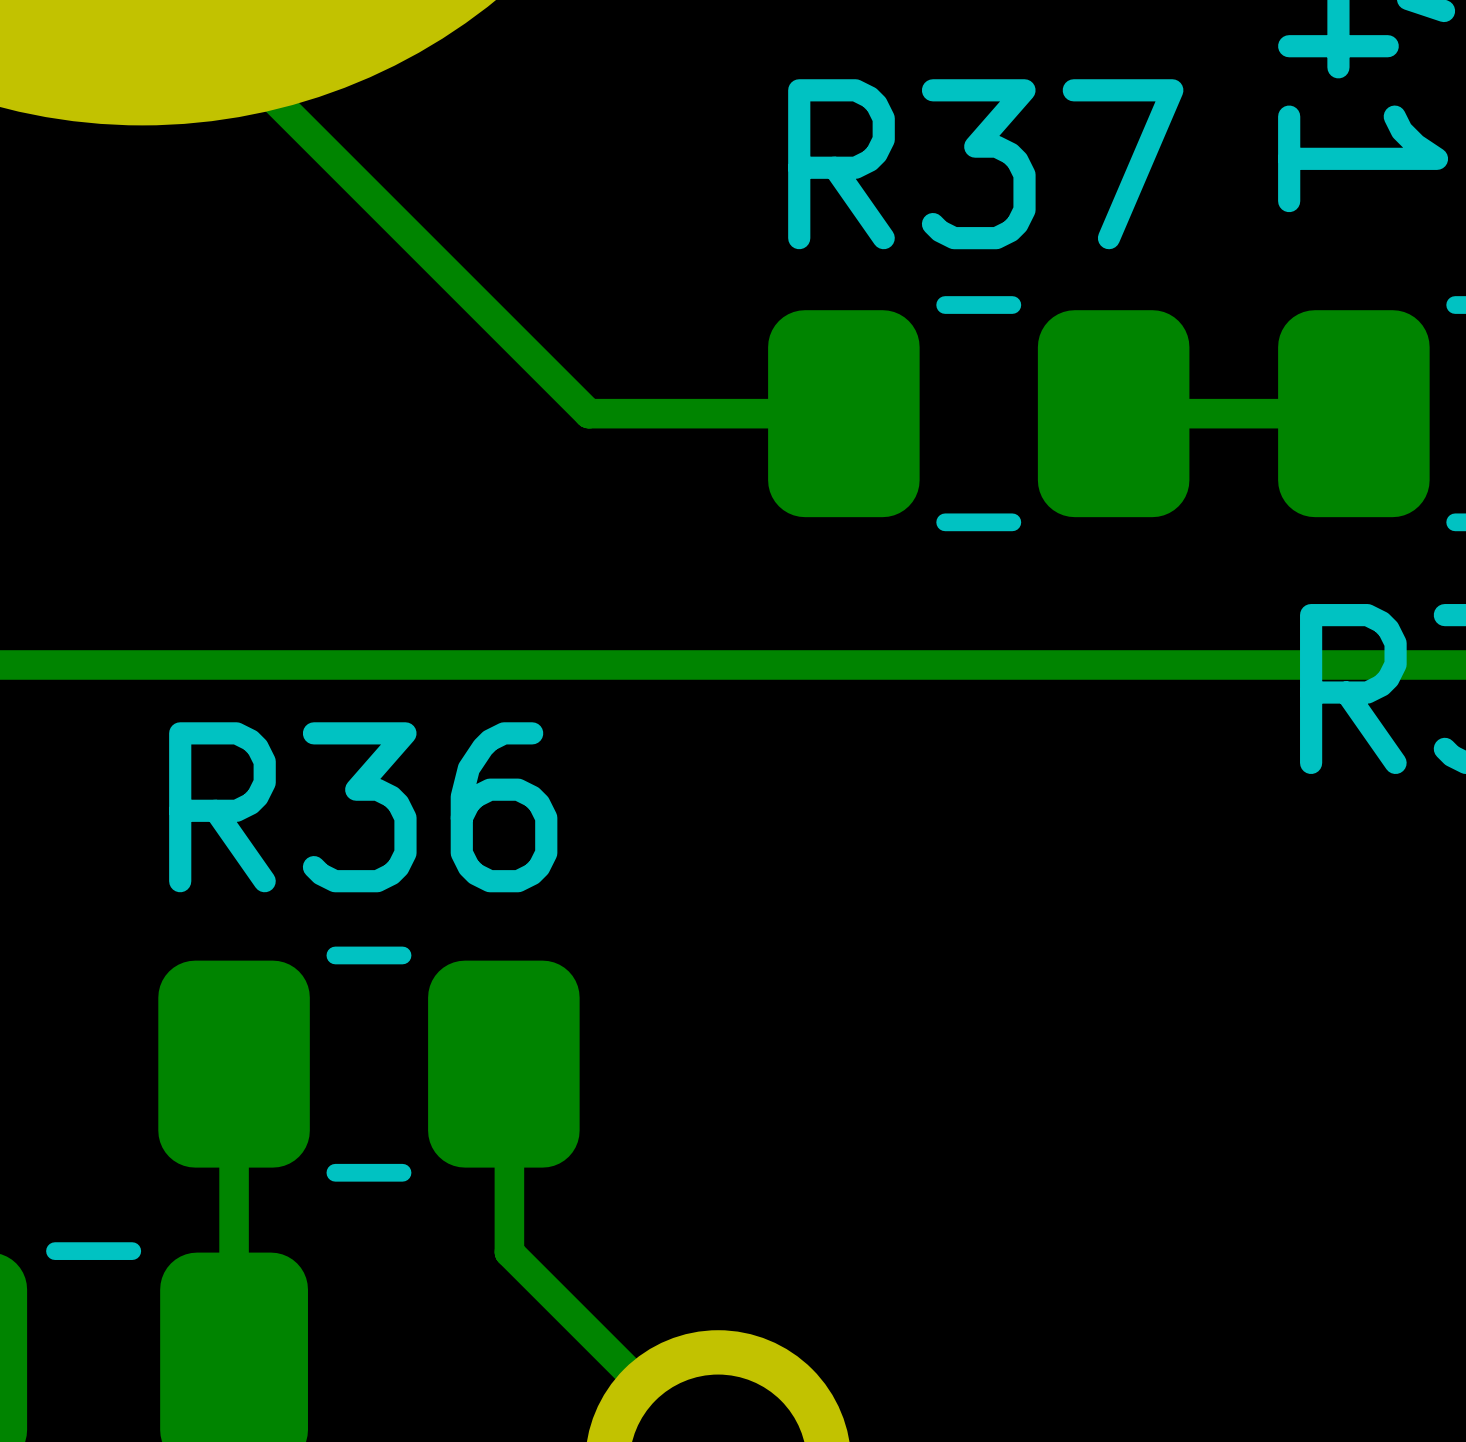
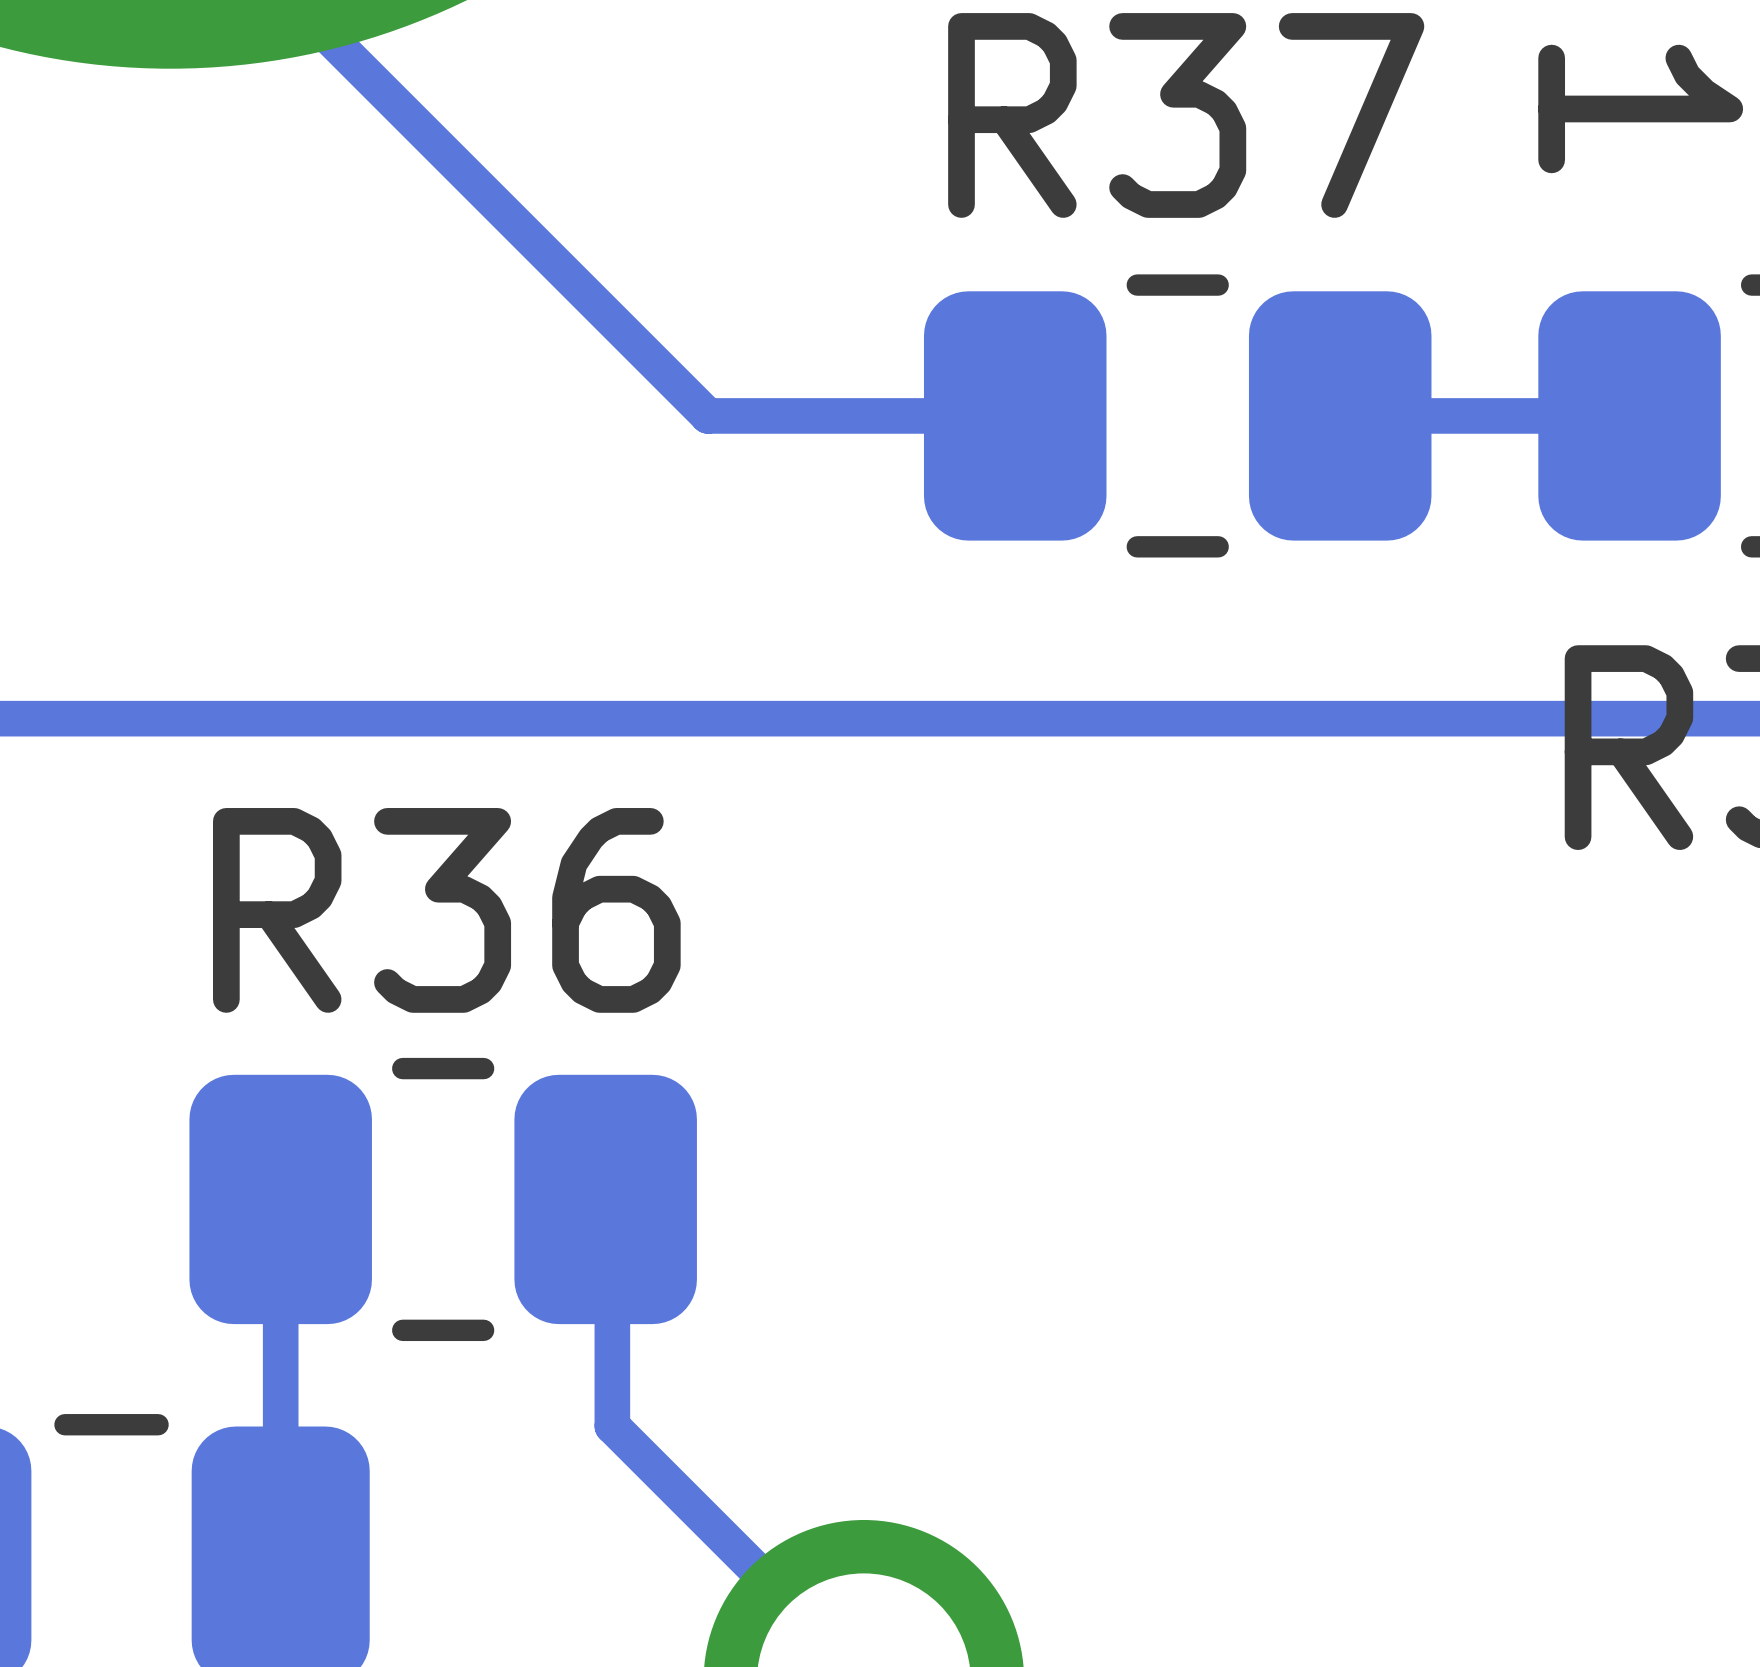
R36 name position: R36 (363, 807) -> R36 (446, 910)

